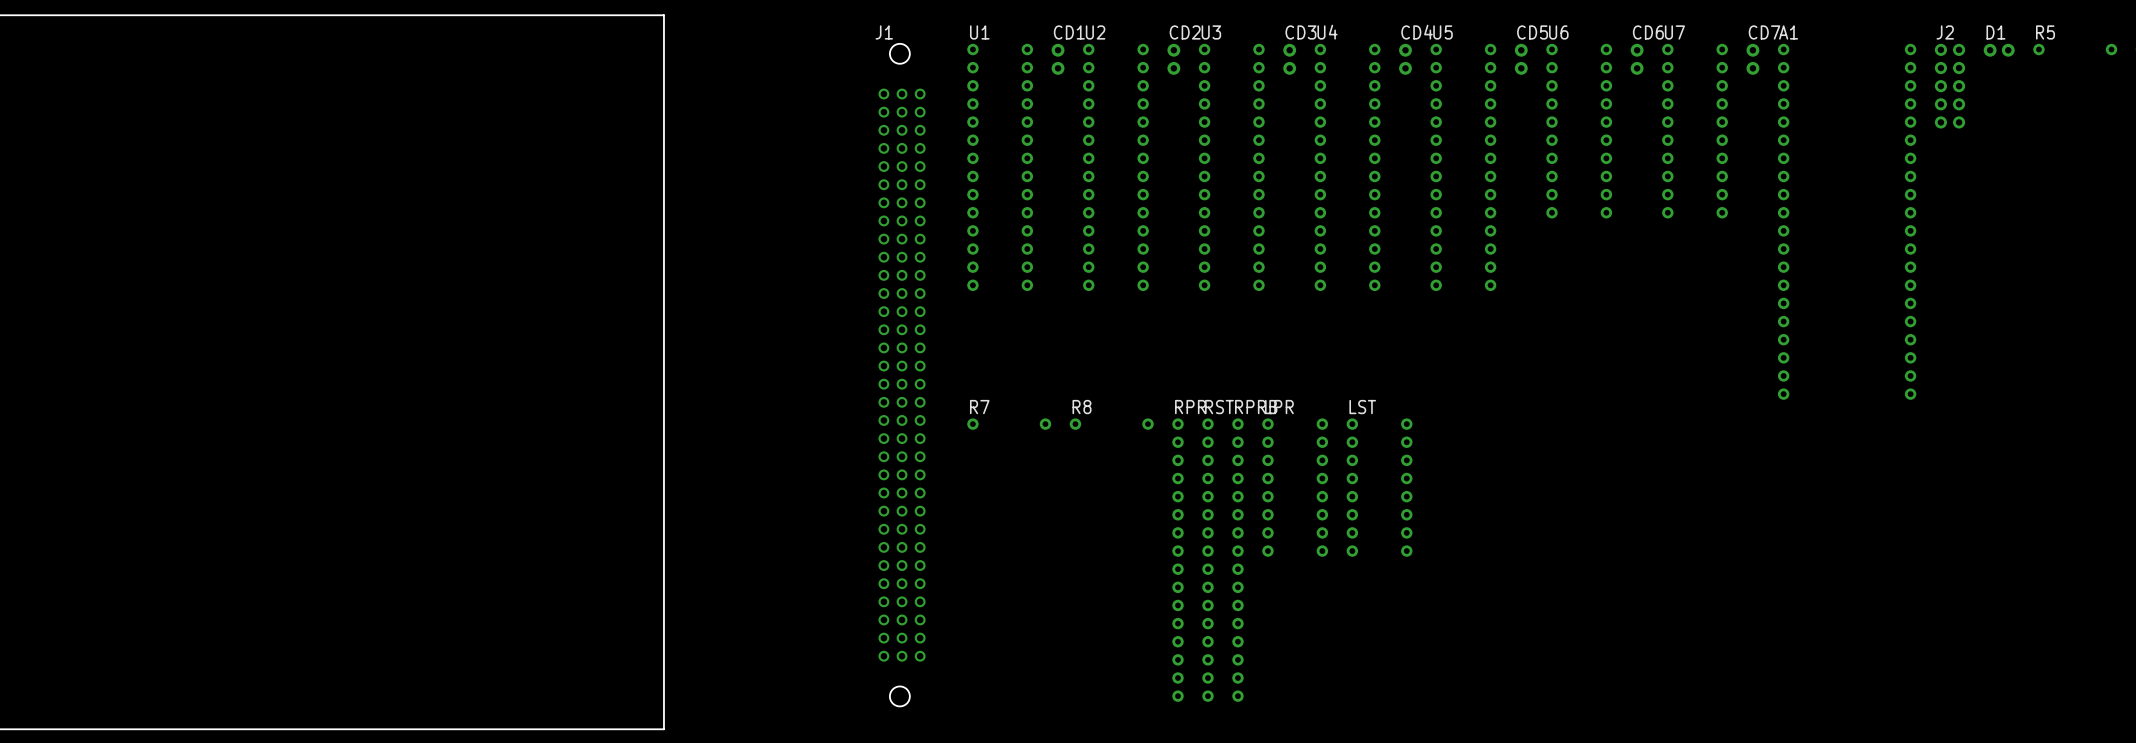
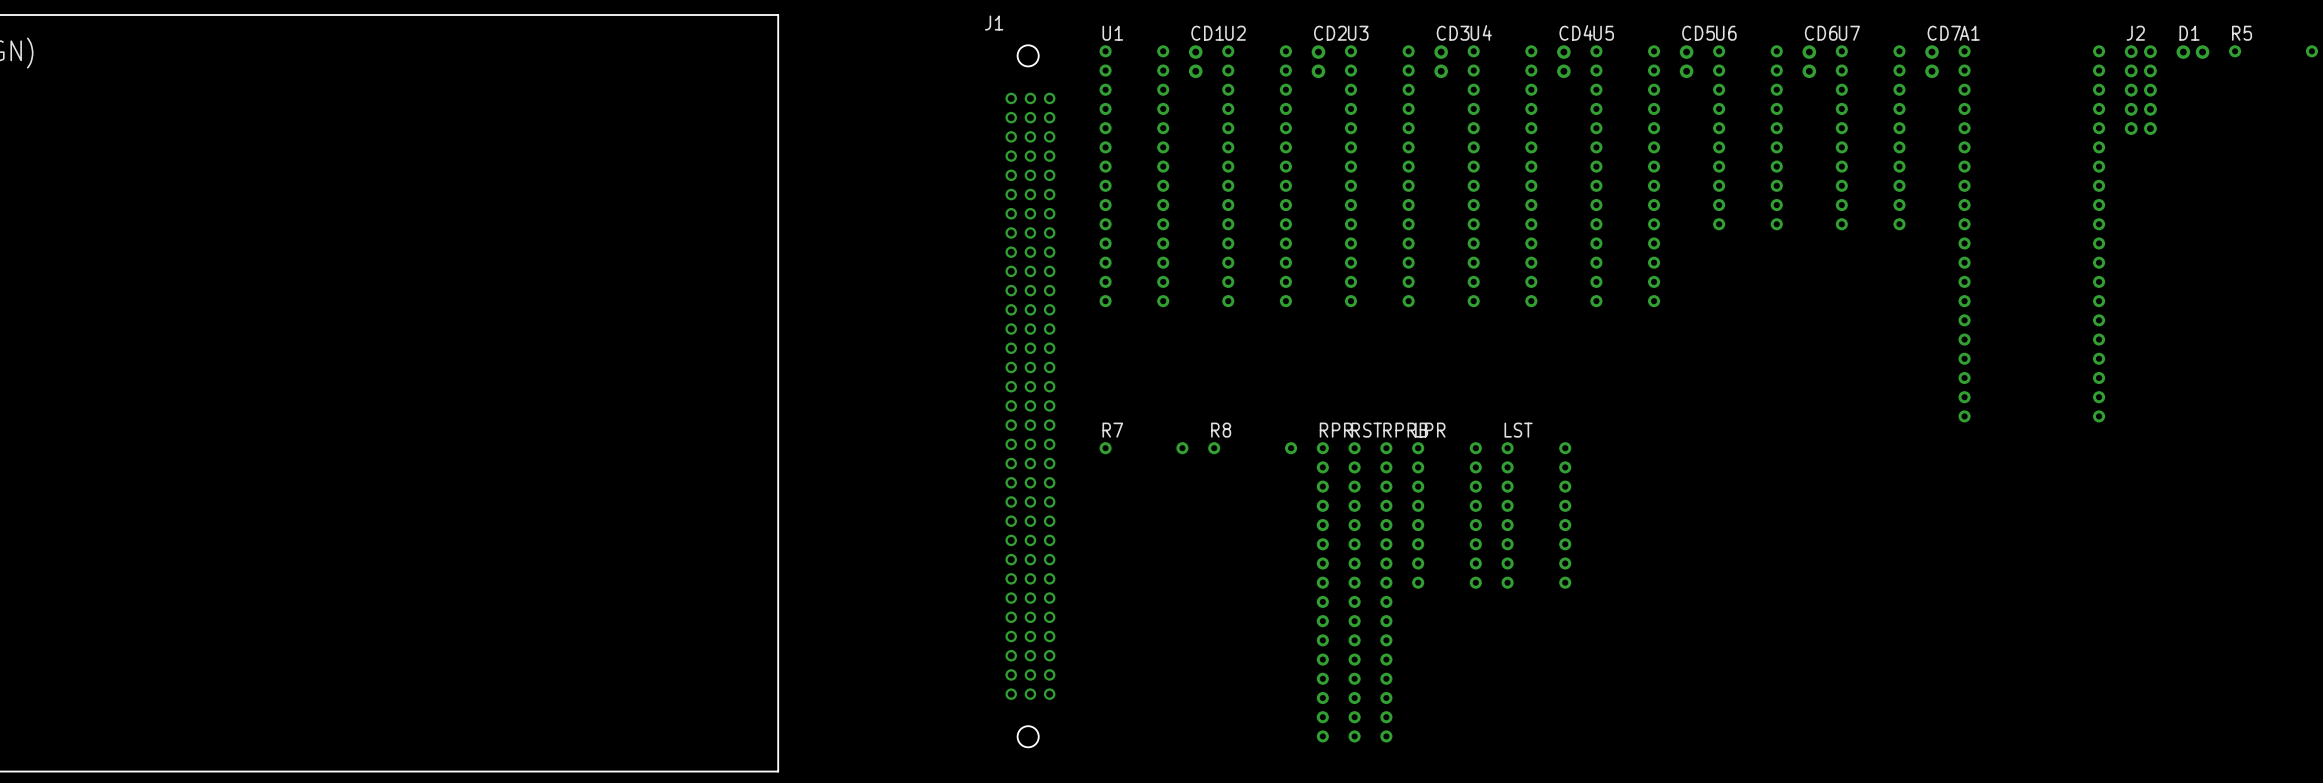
J1 name position: J1 (884, 32) -> J1 (994, 23)

